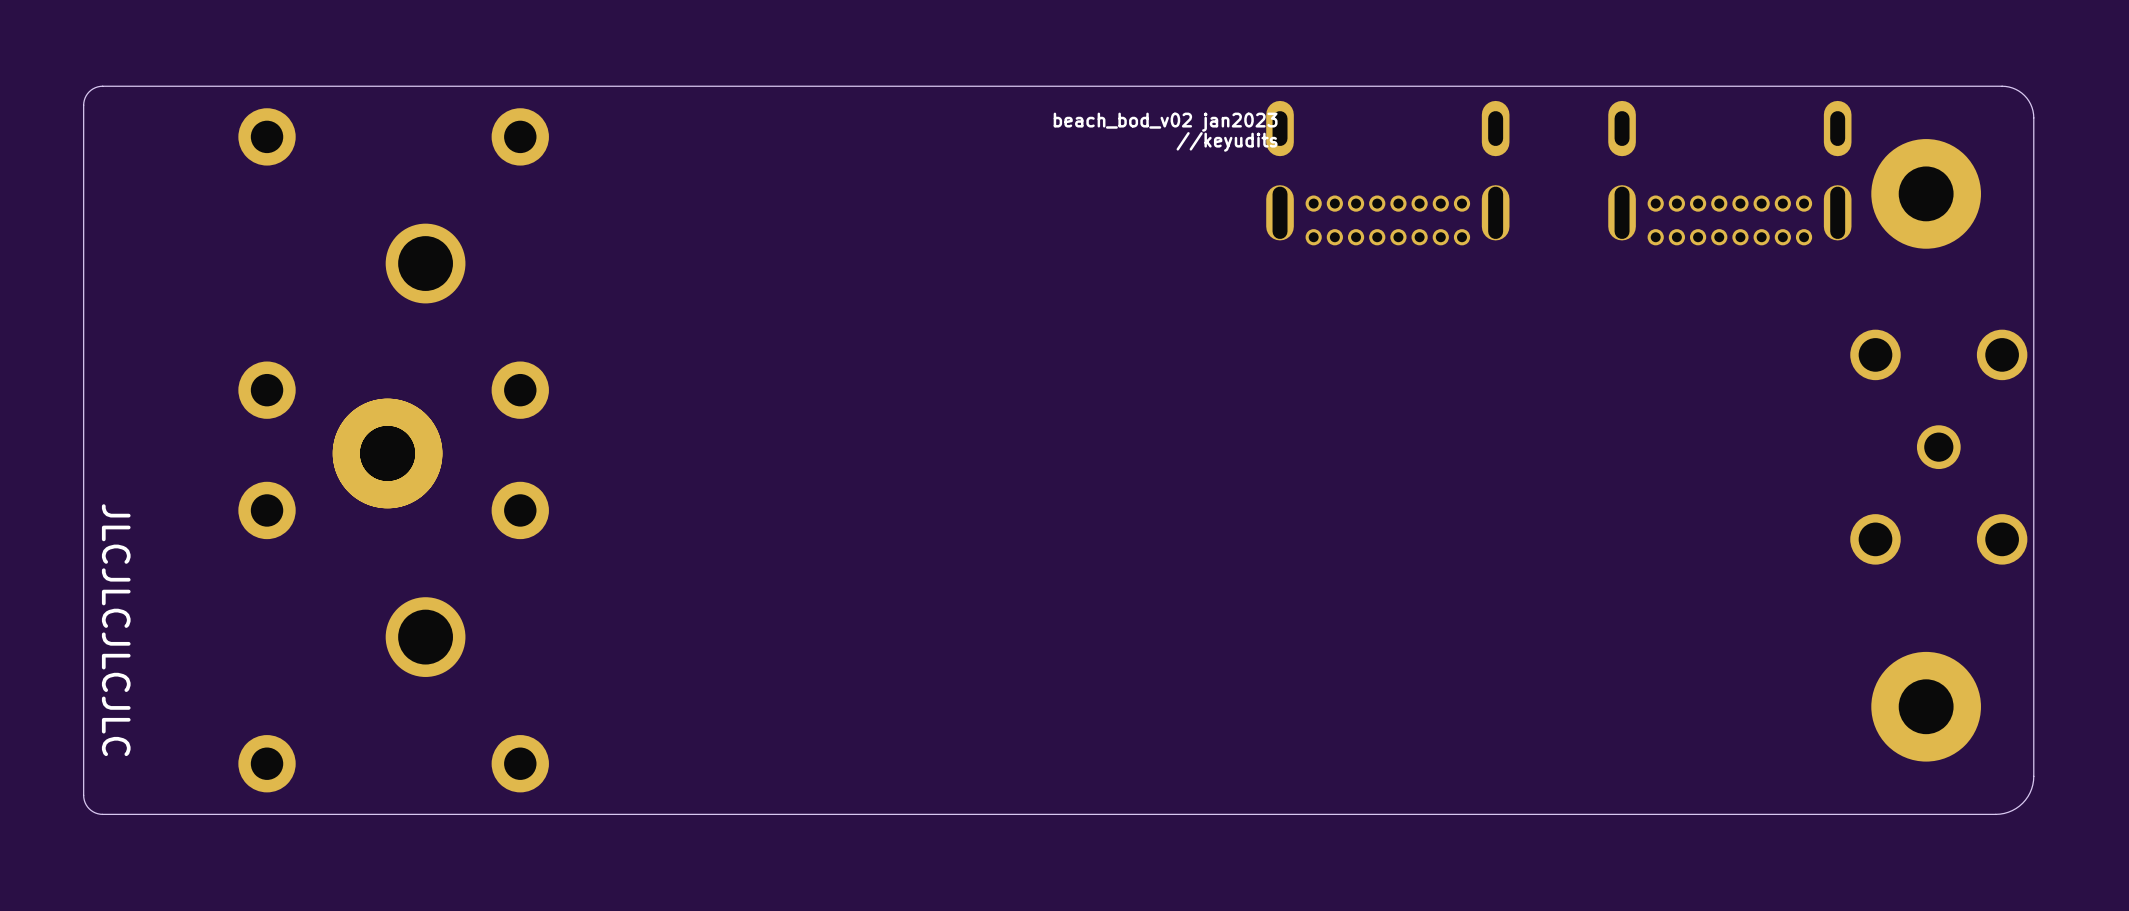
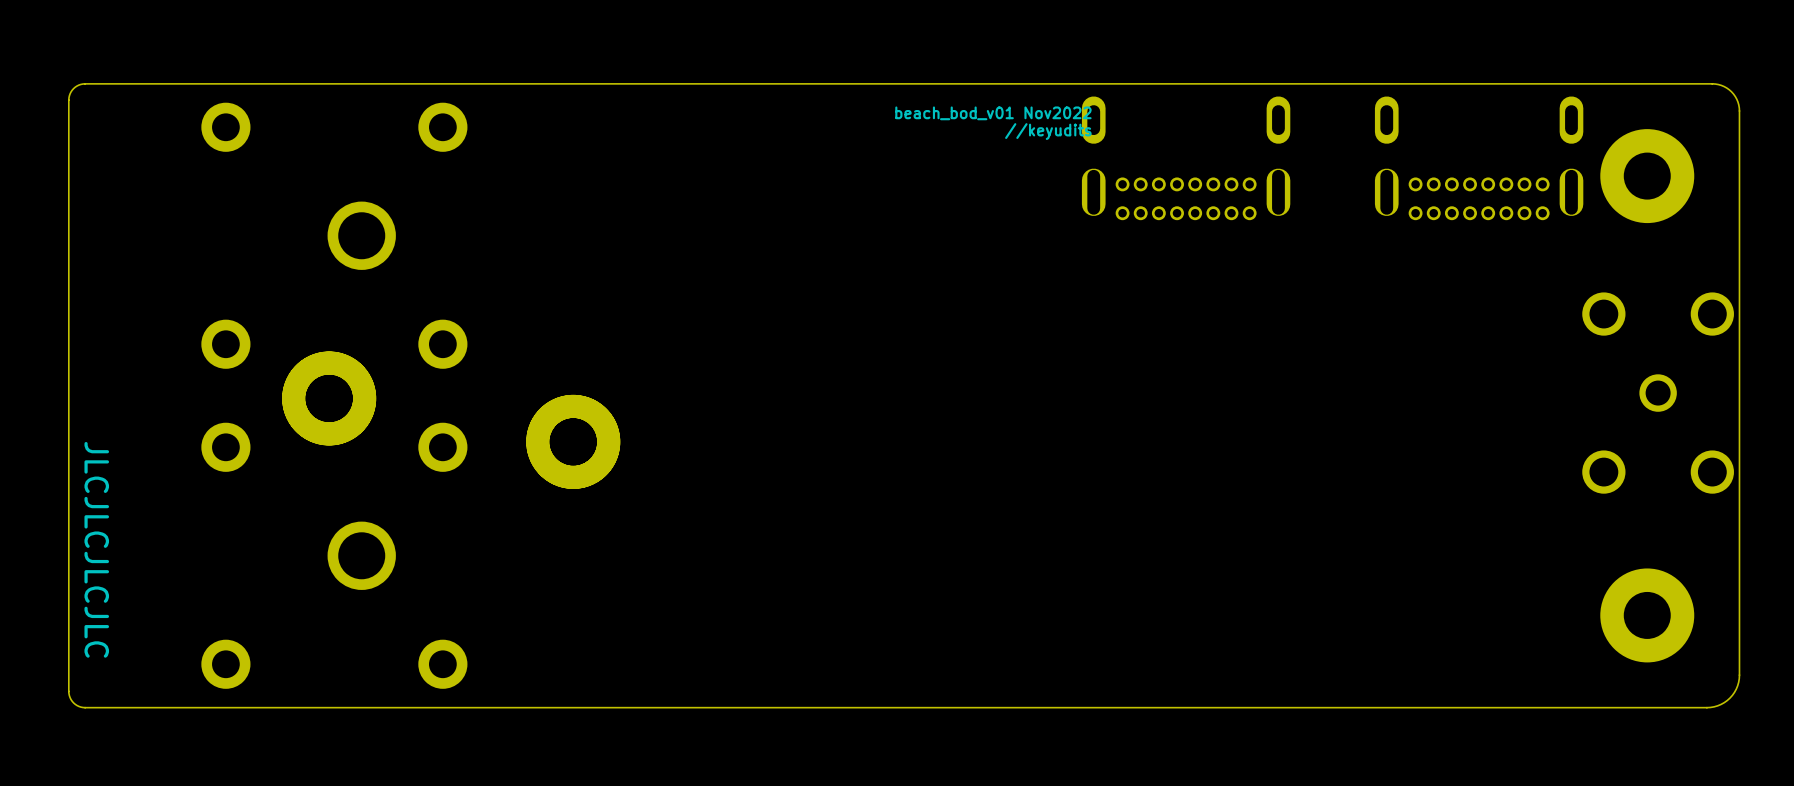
text: beach_bod_v02 jan2023 (1165, 122) -> beach_bod_v01 Nov2022 (993, 113)
part: none -> (573, 441)

